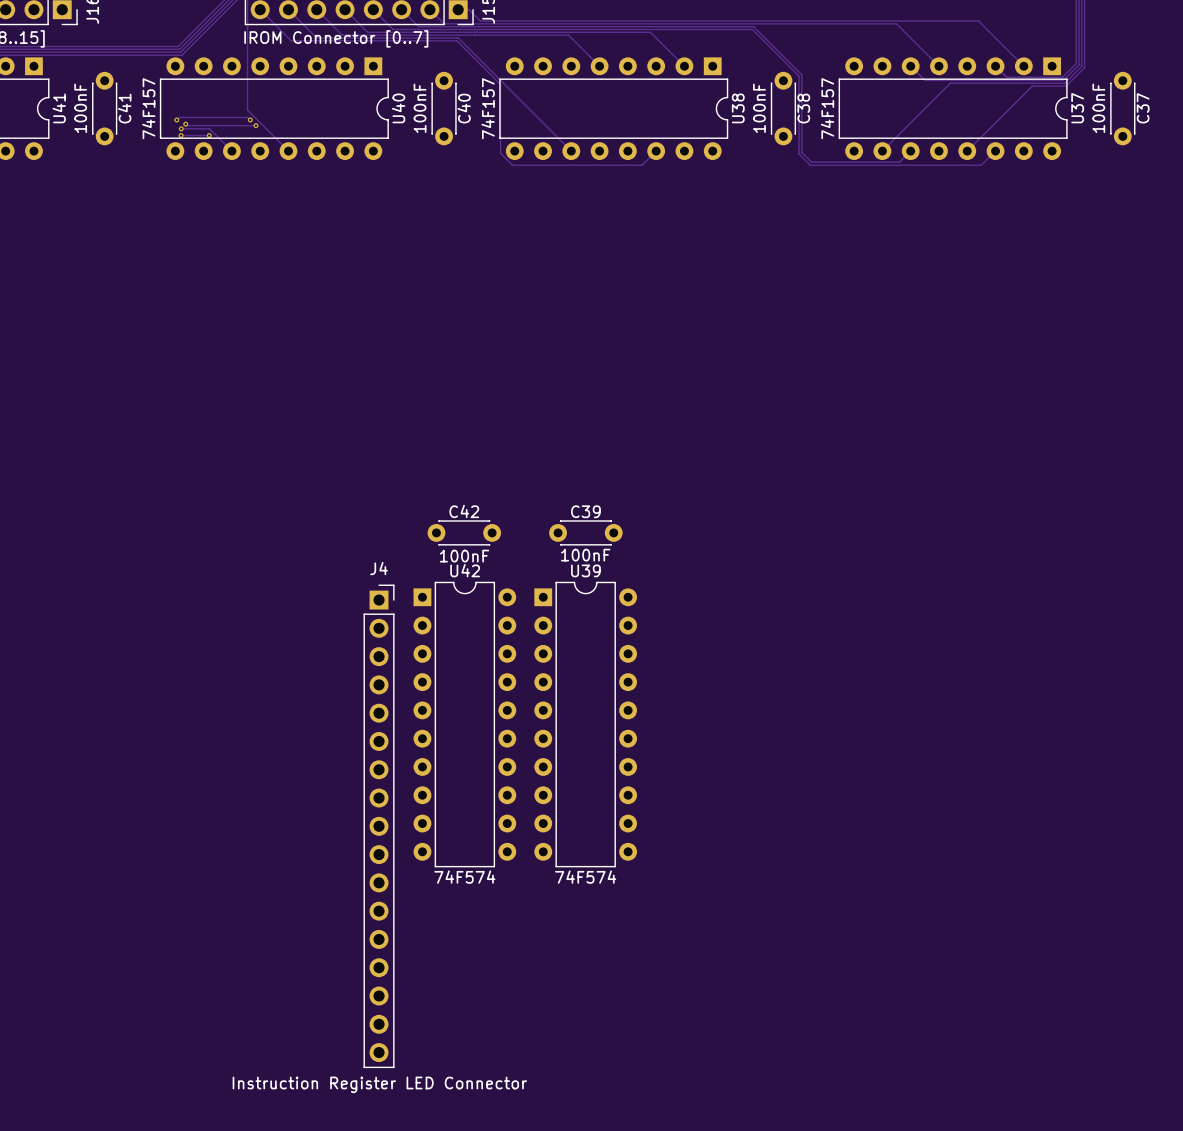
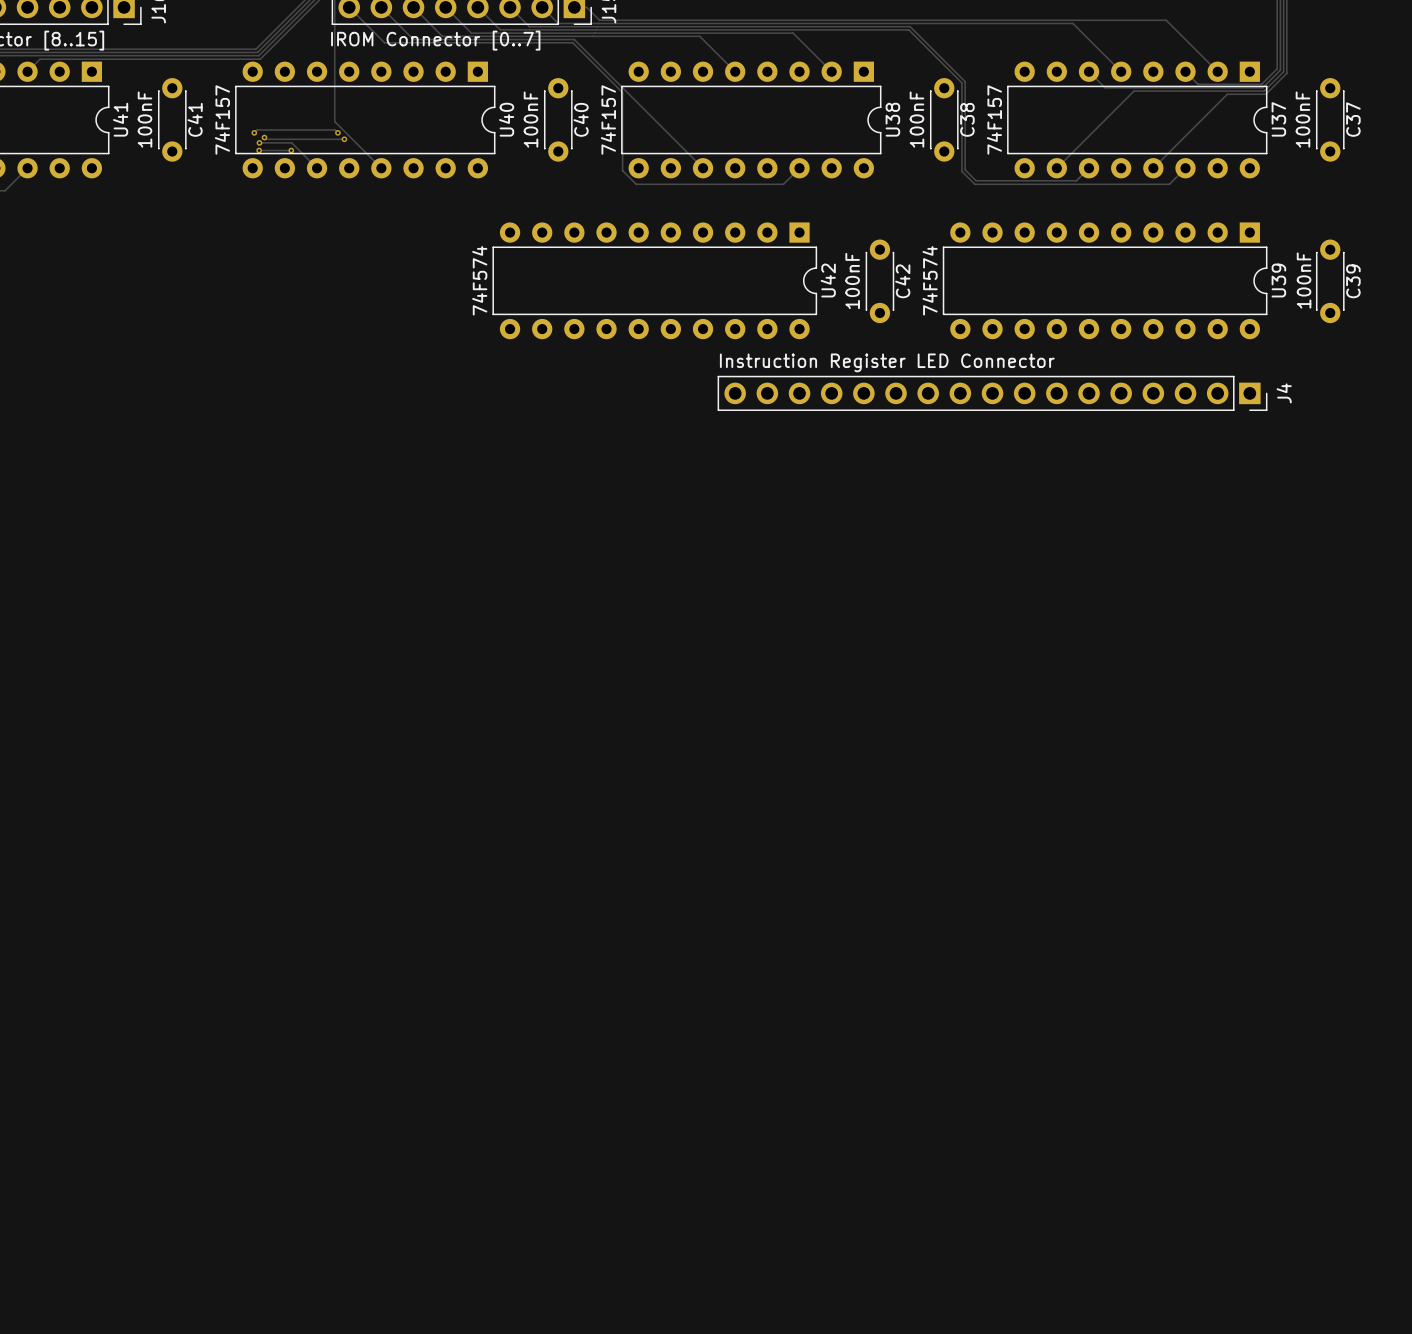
C42 rotation: 0° (464, 532) -> 90° clockwise (879, 281)
C42 position: (464, 532) -> (879, 281)
C39 rotation: 0° (585, 532) -> 90° clockwise (1330, 281)
C39 position: (585, 532) -> (1330, 281)
U42 rotation: 0° (464, 724) -> 90° clockwise (654, 280)
U42 position: (464, 724) -> (654, 280)
U39 rotation: 0° (585, 724) -> 90° clockwise (1105, 280)
U39 position: (585, 724) -> (1105, 280)
J4 rotation: 0° (379, 826) -> 90° clockwise (992, 393)
J4 position: (379, 826) -> (992, 393)
J4 value position: Instruction Register LED Connector (379, 1084) -> Instruction Register LED Connector (887, 362)

